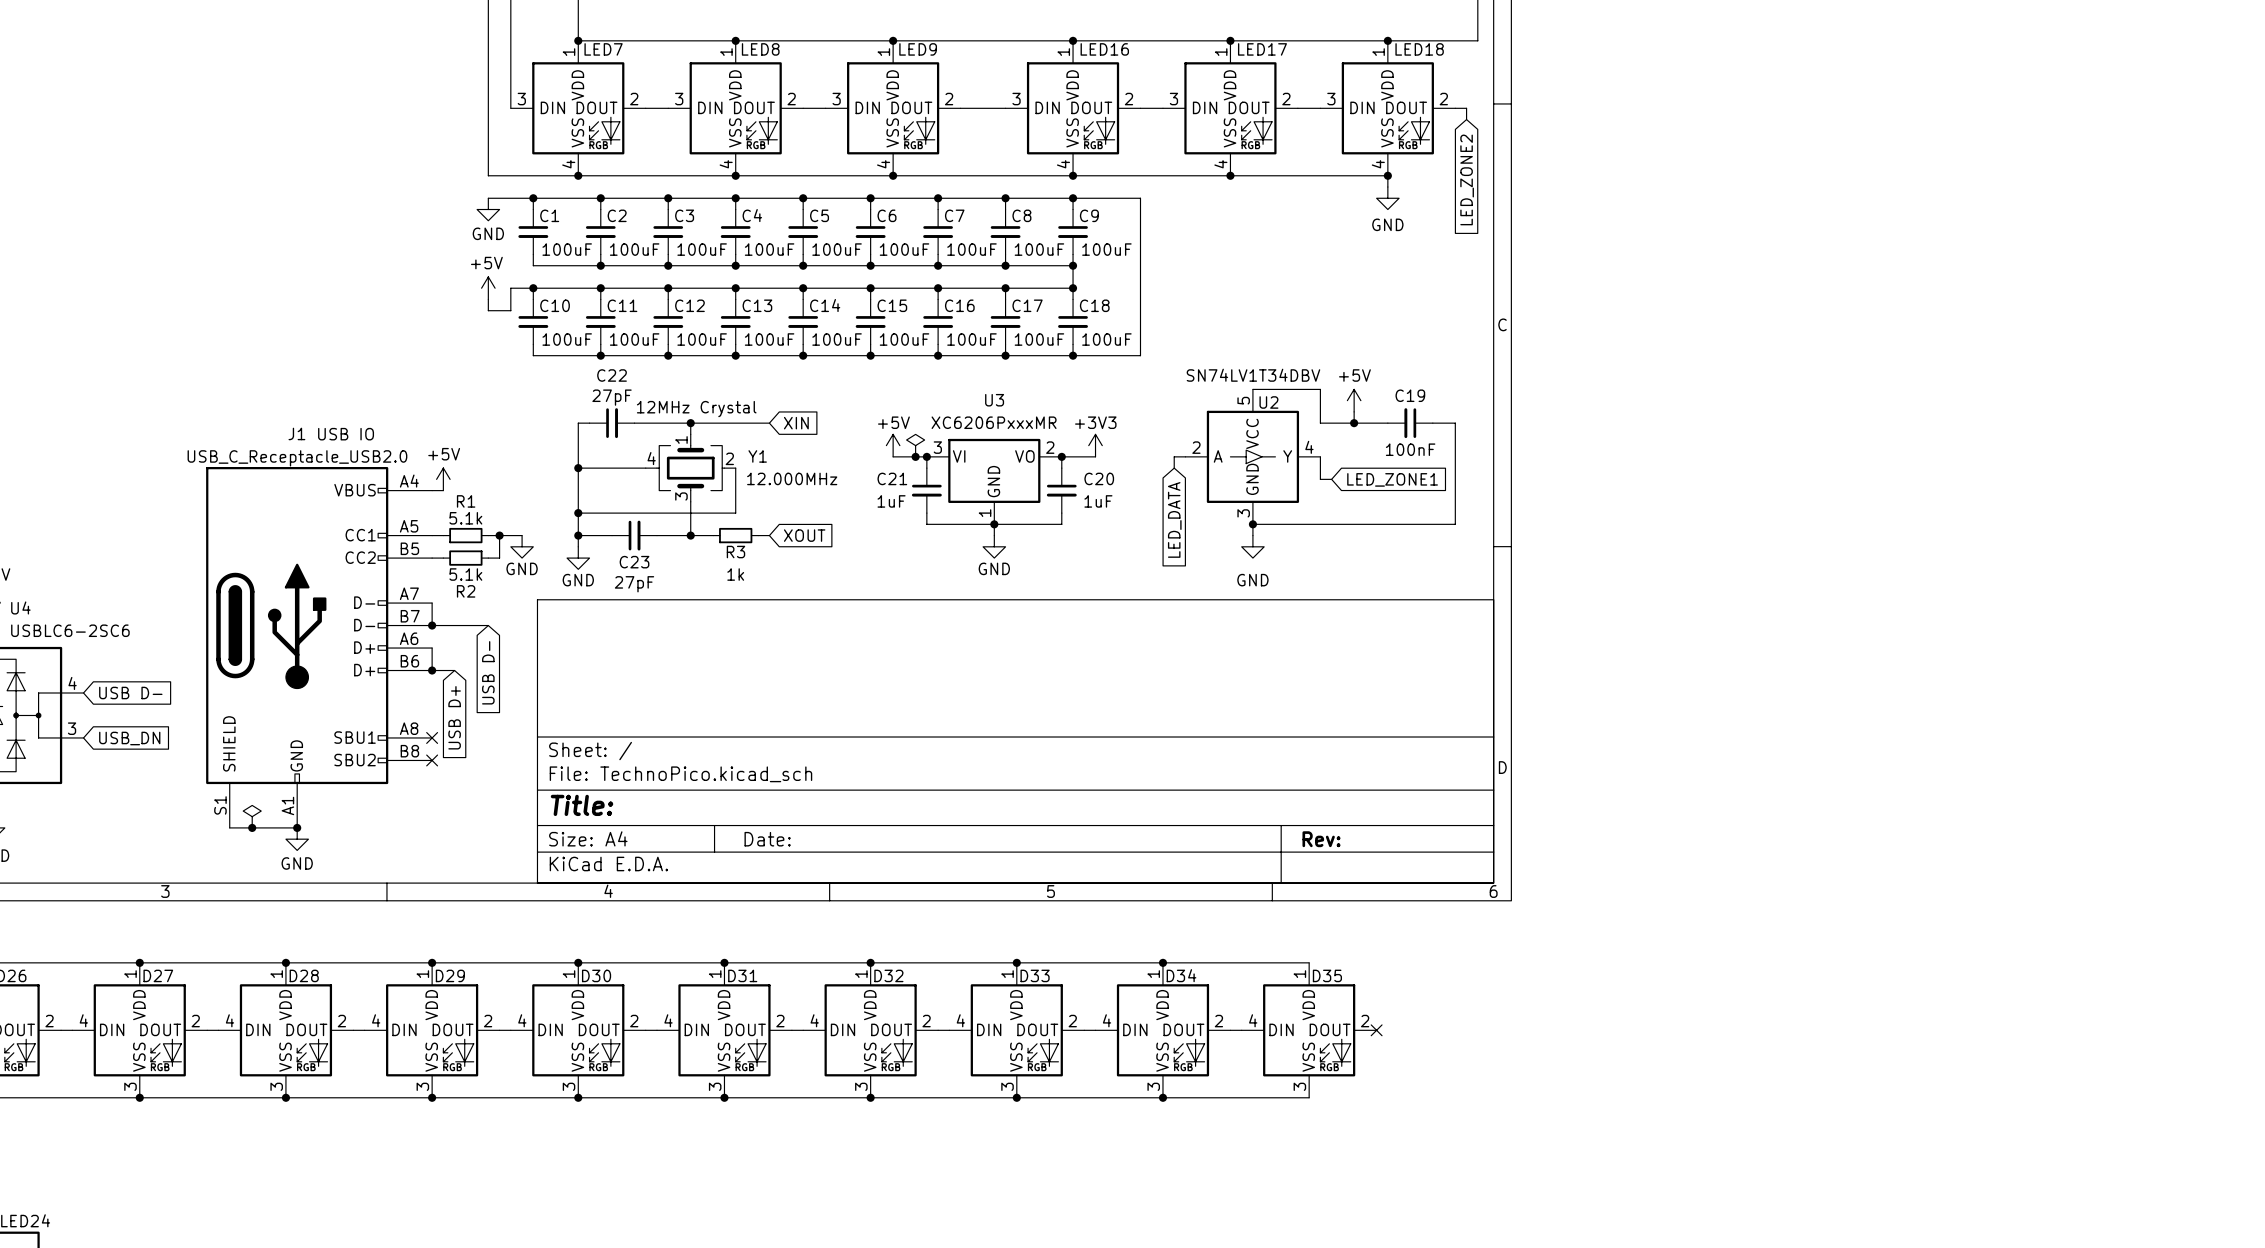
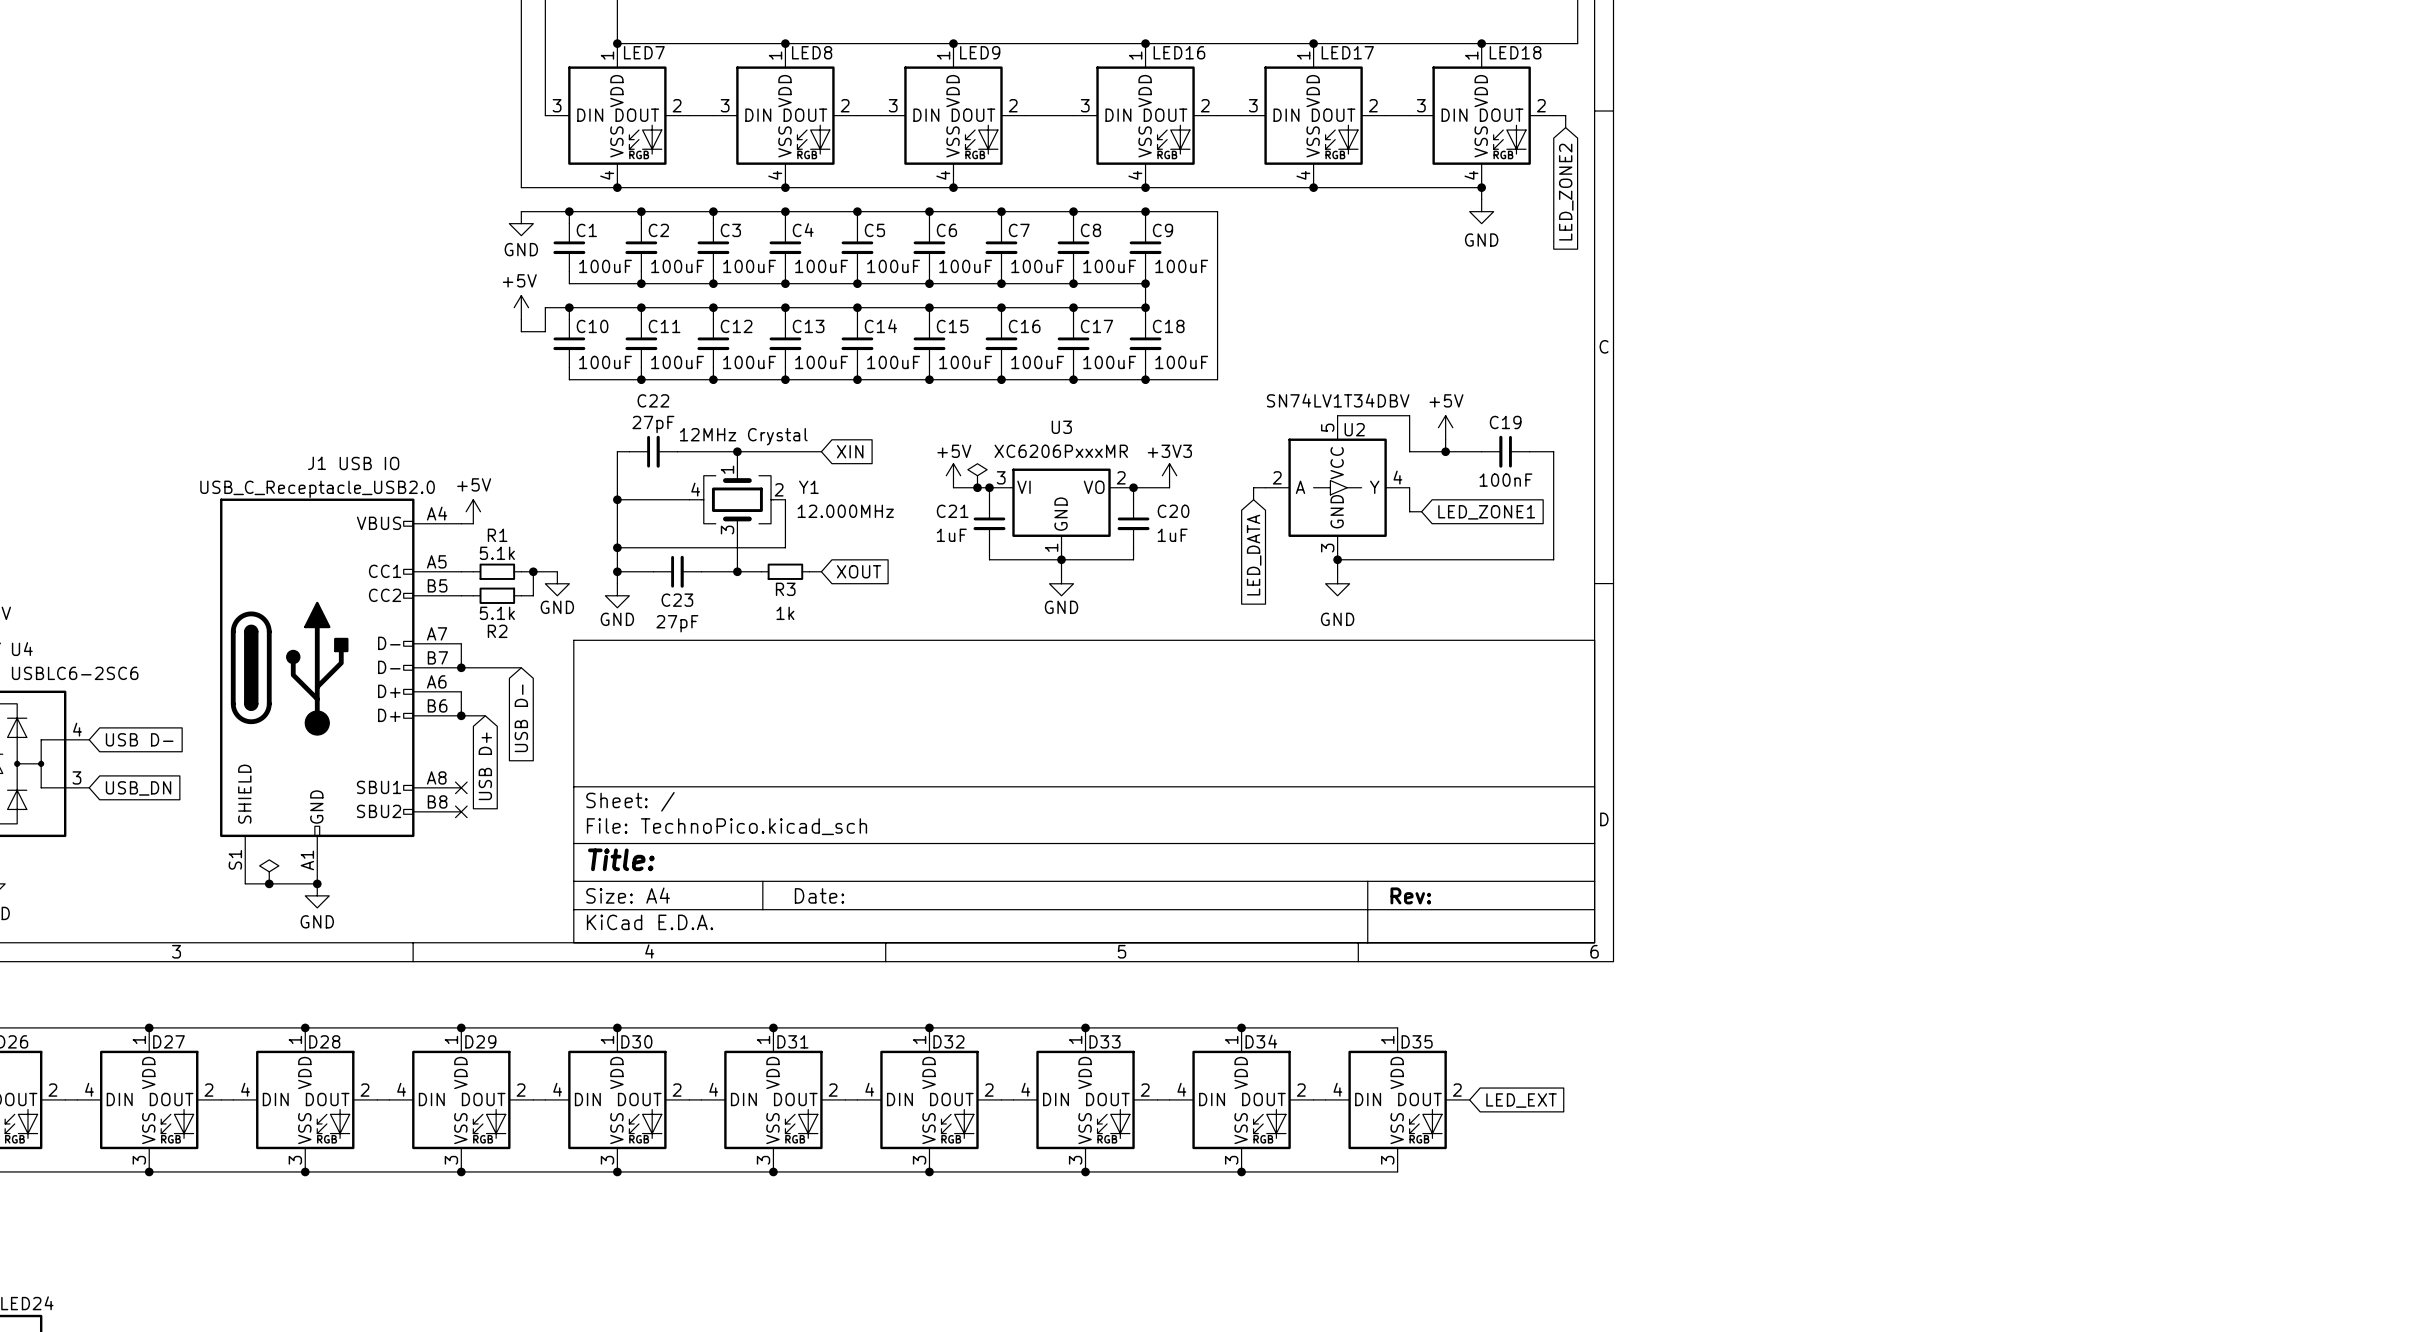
no-connect mark: (1376, 1030) -> none
global label: none -> LED_EXT (1521, 1100)

